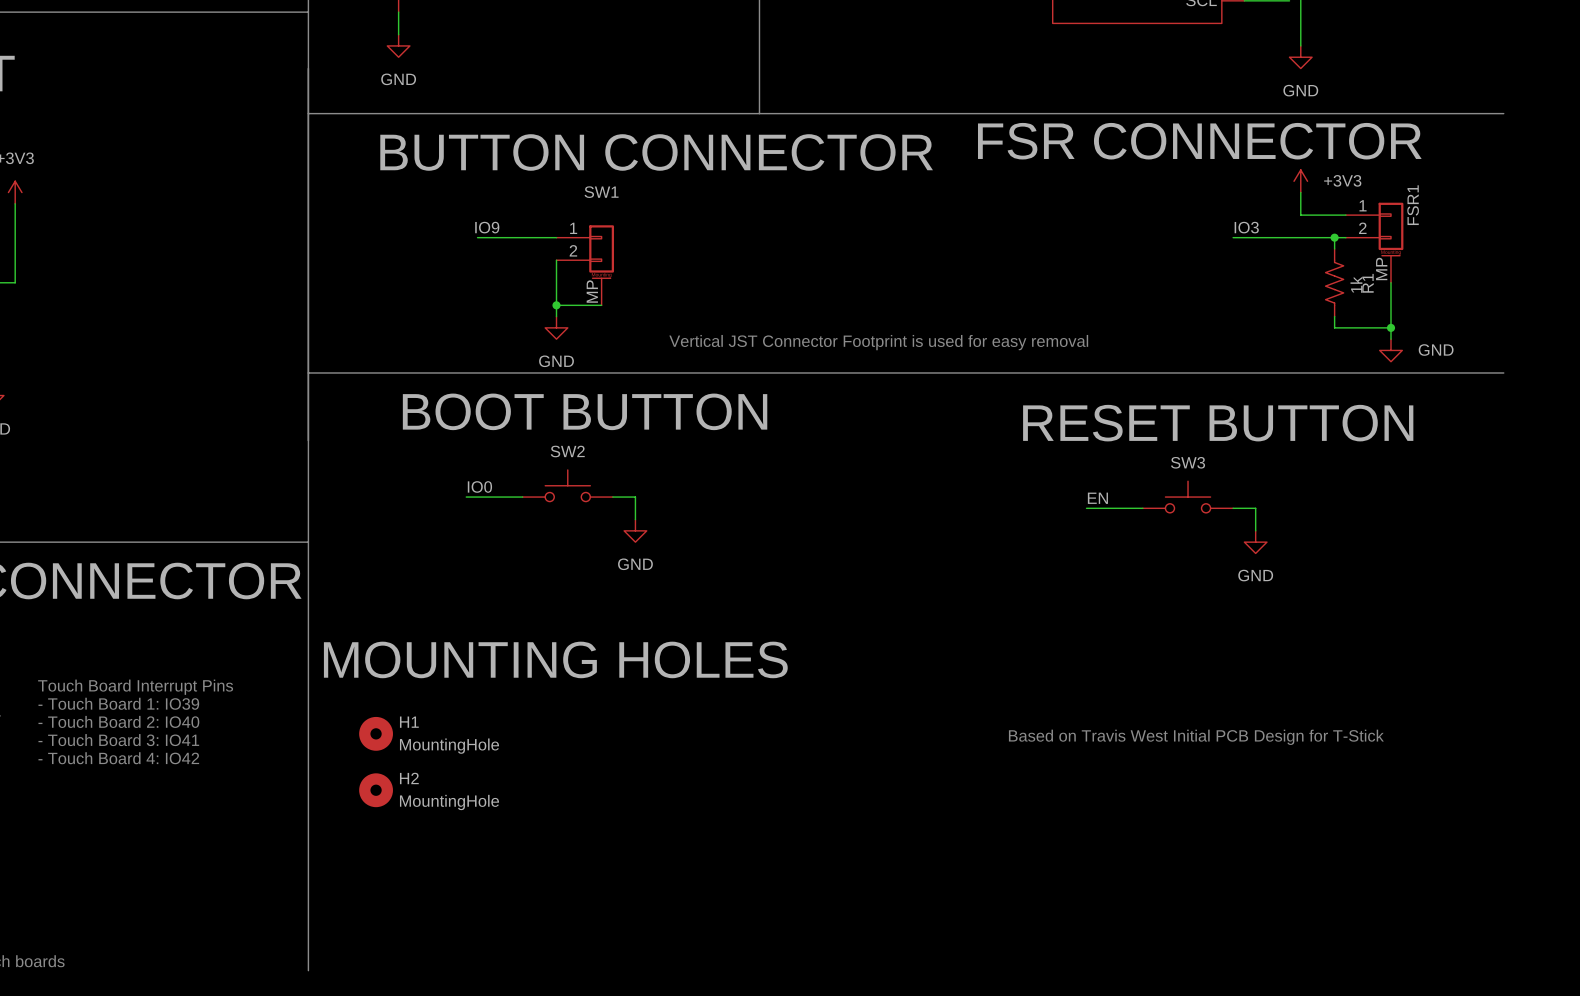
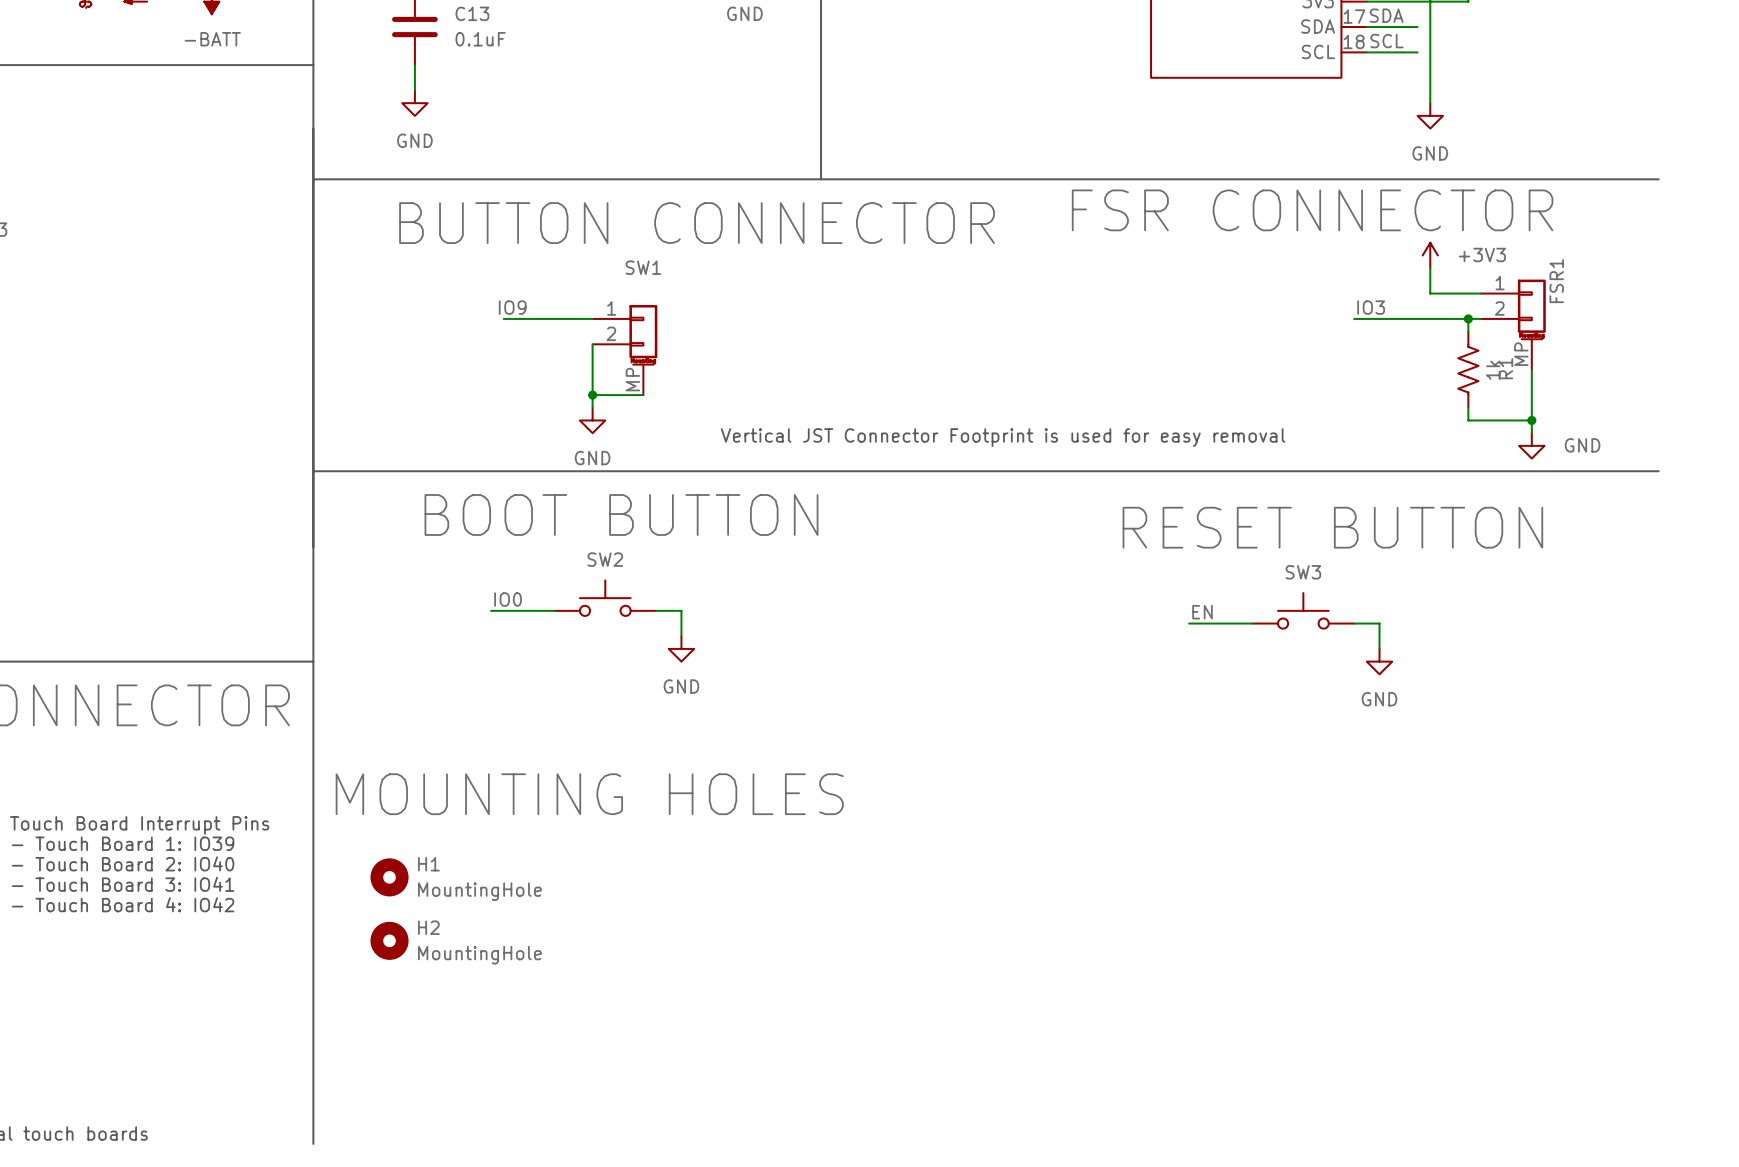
text: Based on Travis West Initial PCB Design for T-Stick (1196, 737) -> none

